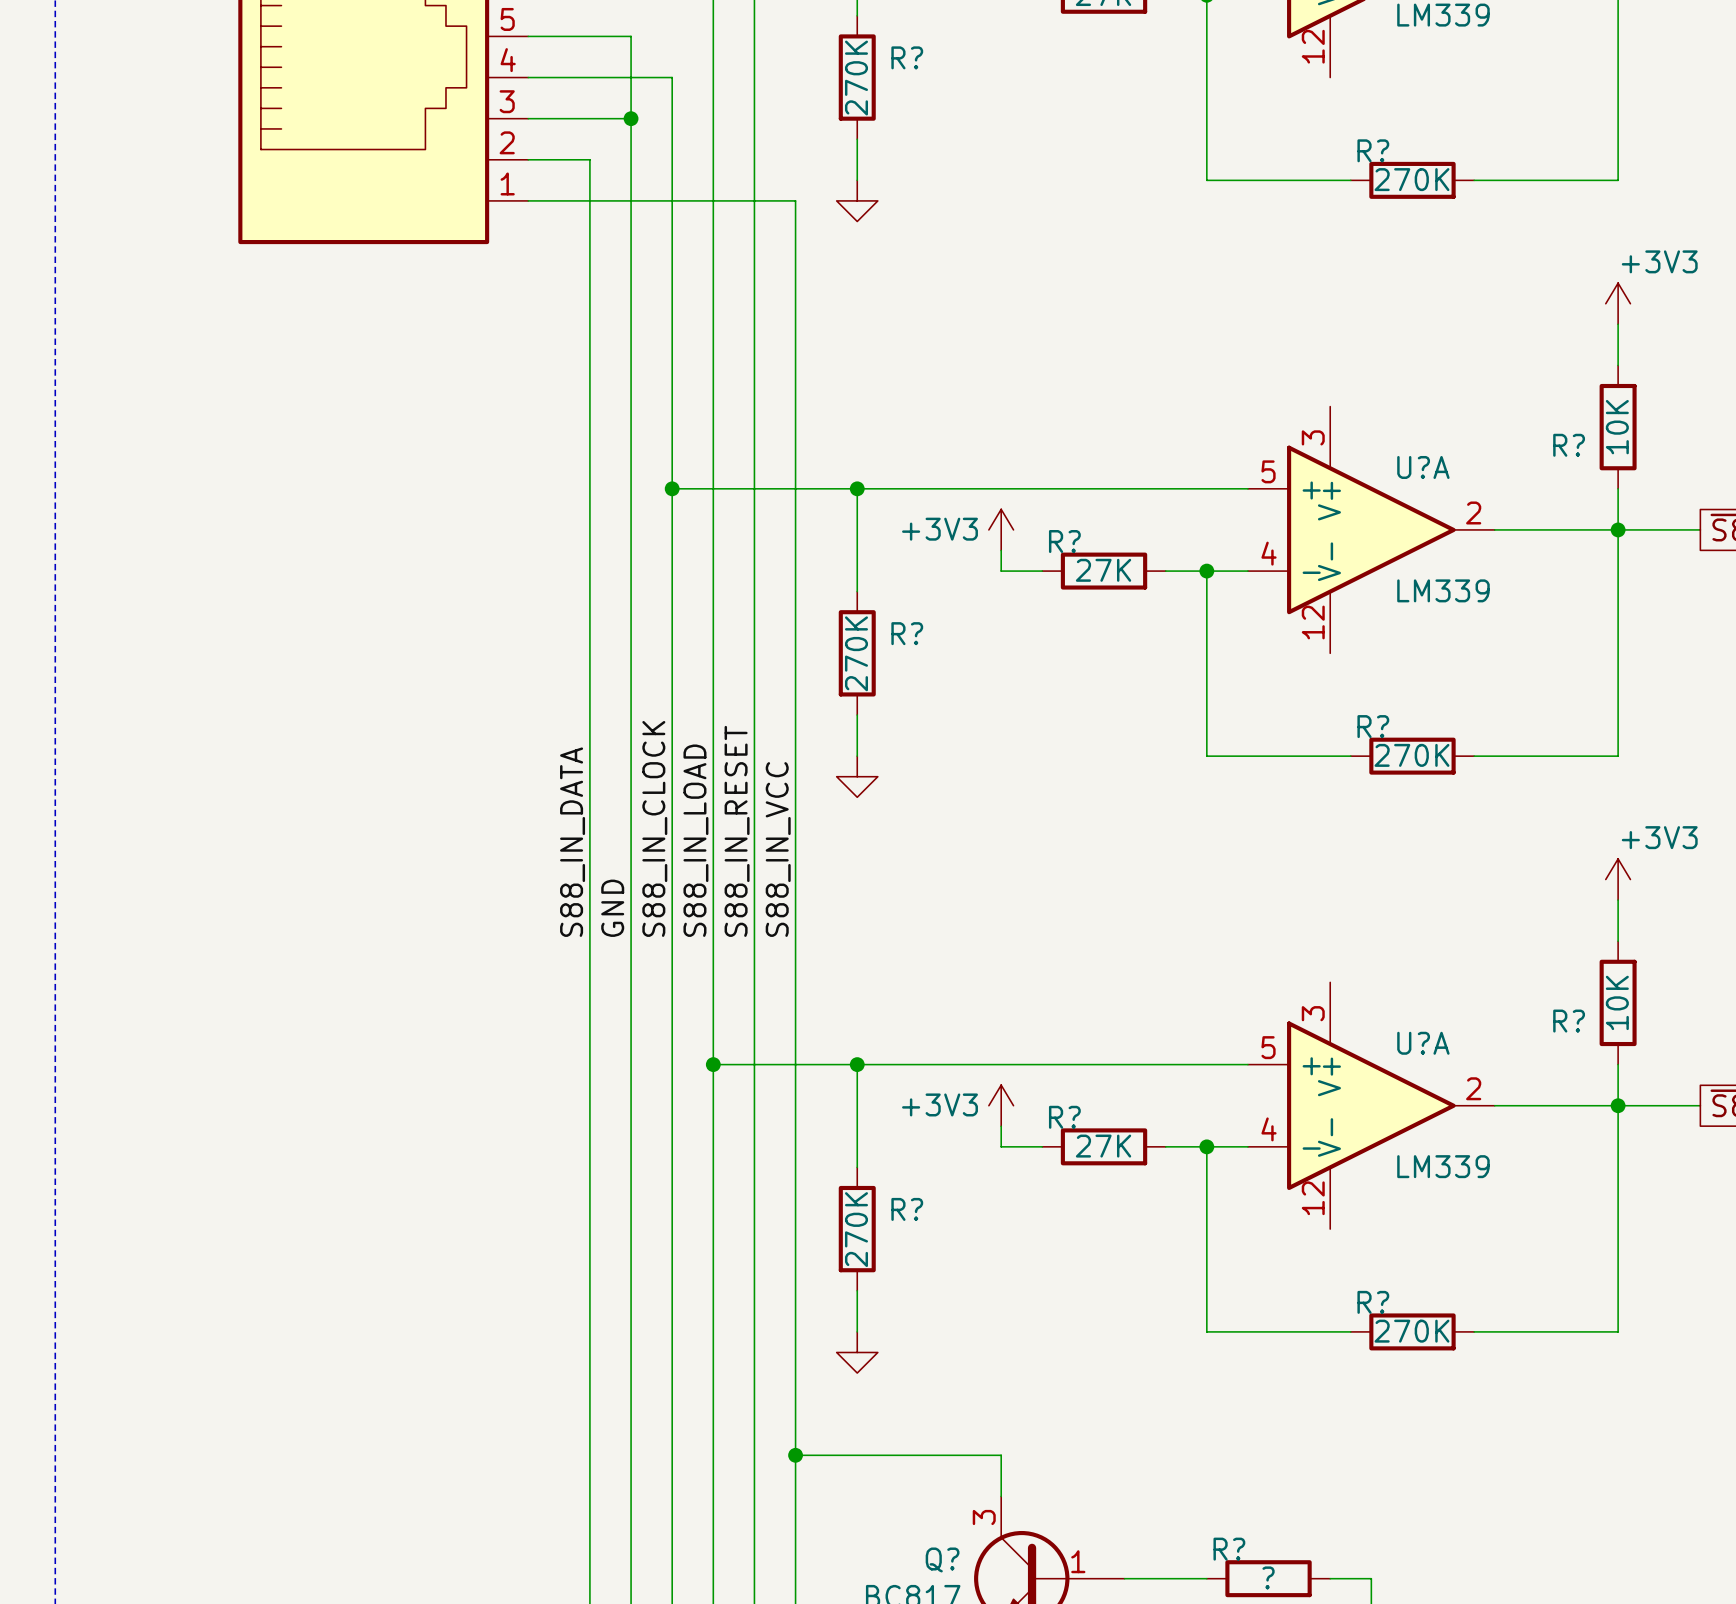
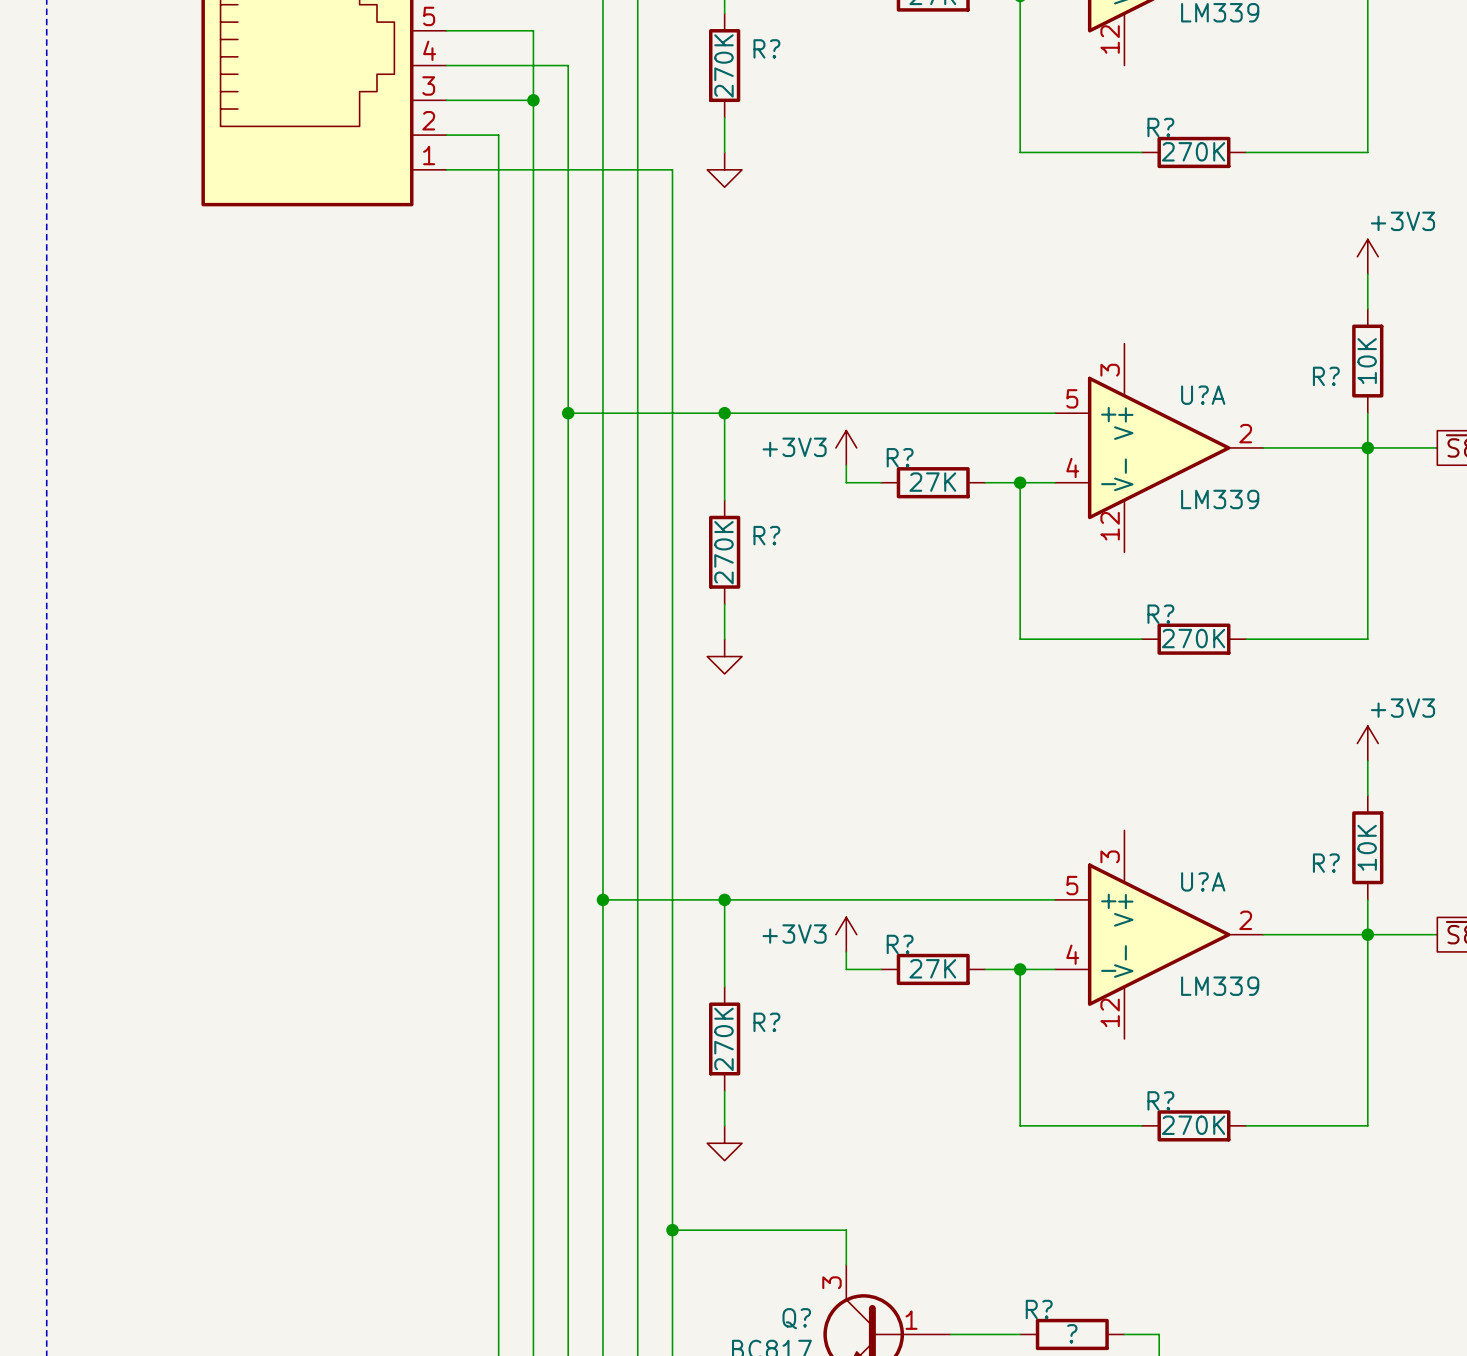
label: S88_IN_CLOCK (654, 828) -> none
label: S88_IN_RESET (737, 831) -> none
label: S88_IN_LOAD (695, 840) -> none
label: S88_IN_DATA (572, 842) -> none
label: S88_IN_VCC (778, 849) -> none
label: GND (612, 908) -> none

